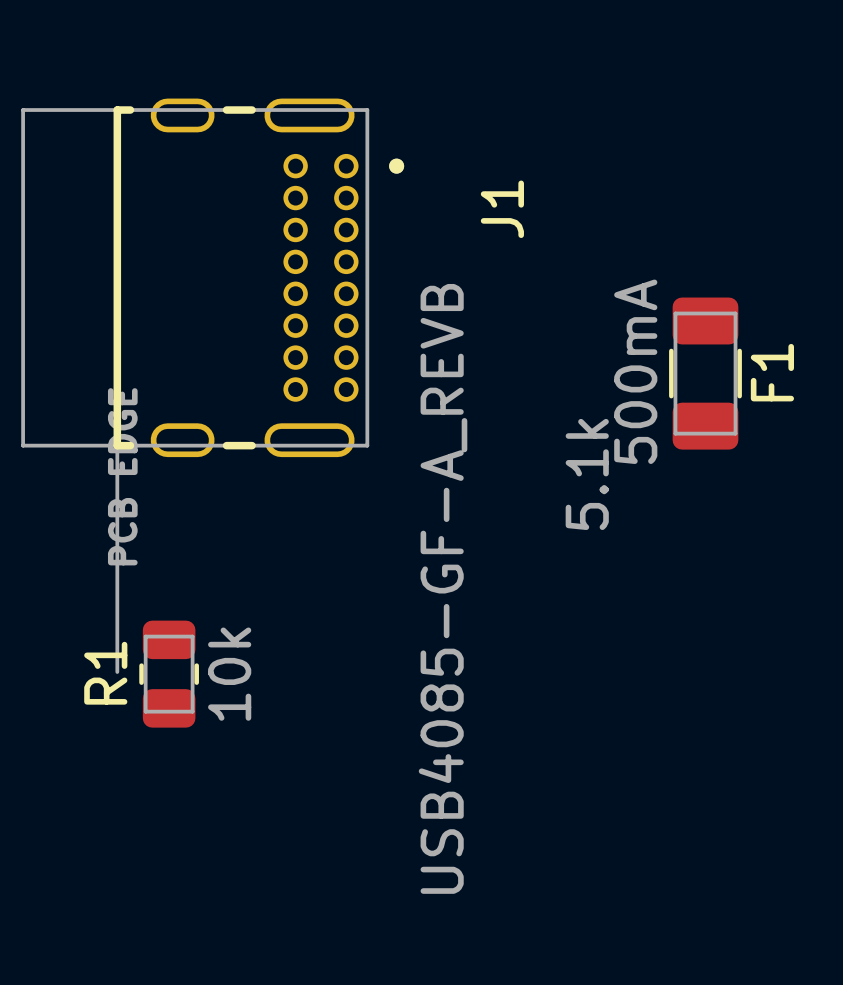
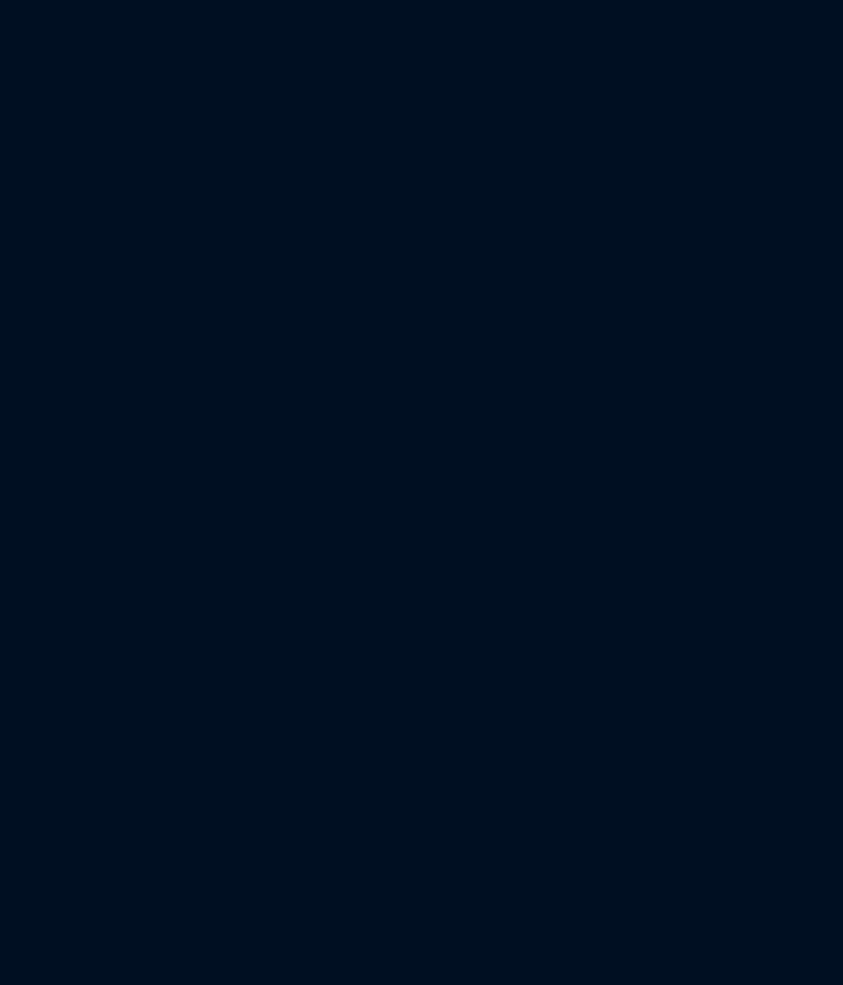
F1: 500mA (705, 373) -> none
J1: USB4085-GF-A_REVB (212, 386) -> none
part: 5.1k (587, 474) -> none
R1: 10k (169, 674) -> none

